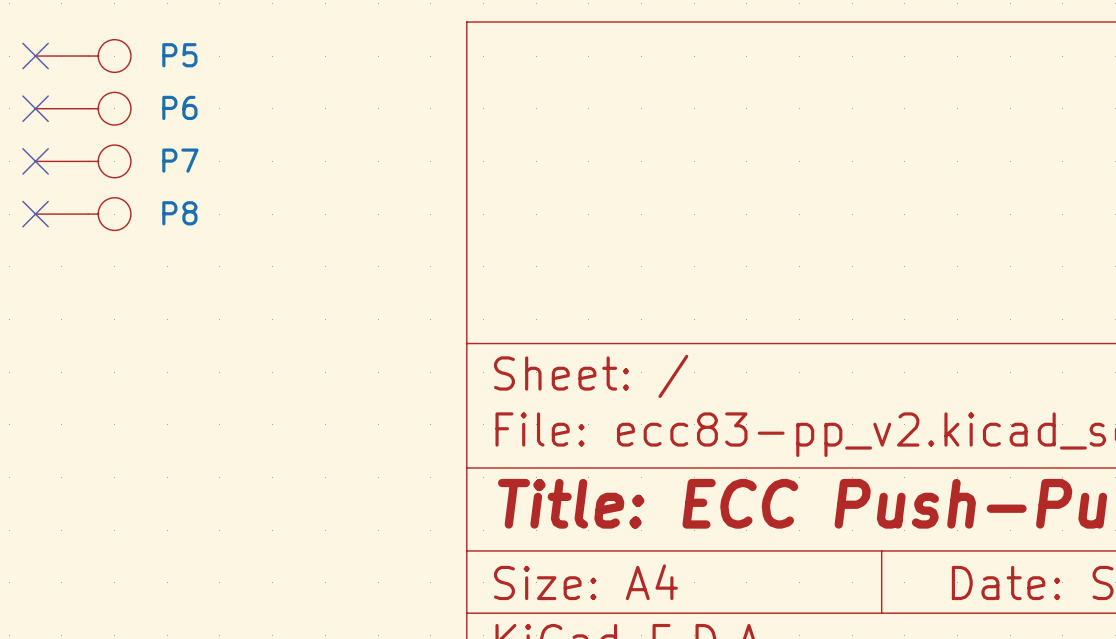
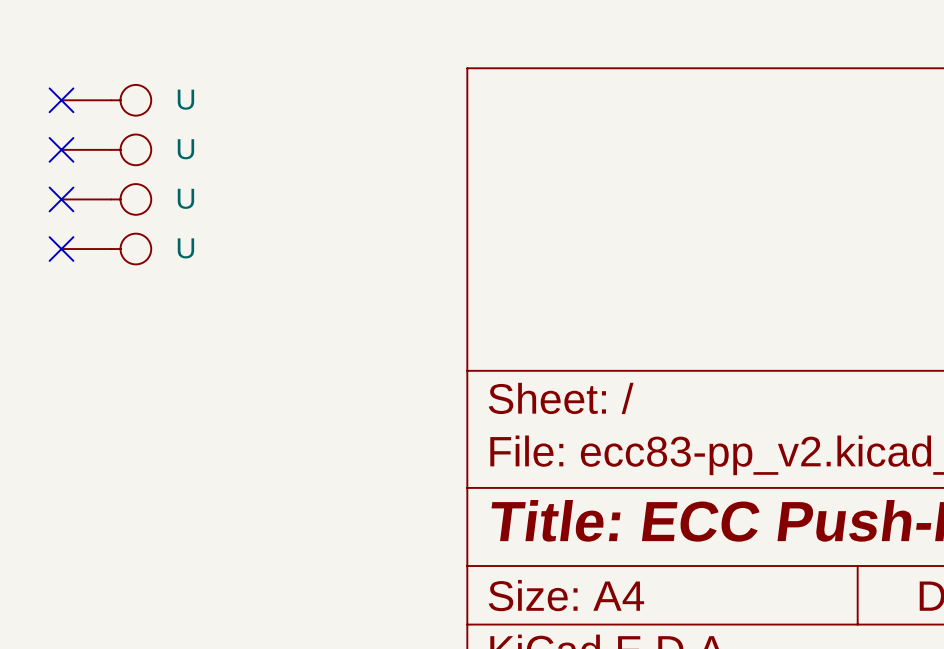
P5 name: P5 (179, 55) -> U (185, 99)
P6 name: P6 (179, 107) -> U (185, 149)
P7 name: P7 (180, 160) -> U (185, 198)
P8 name: P8 (179, 213) -> U (185, 248)

